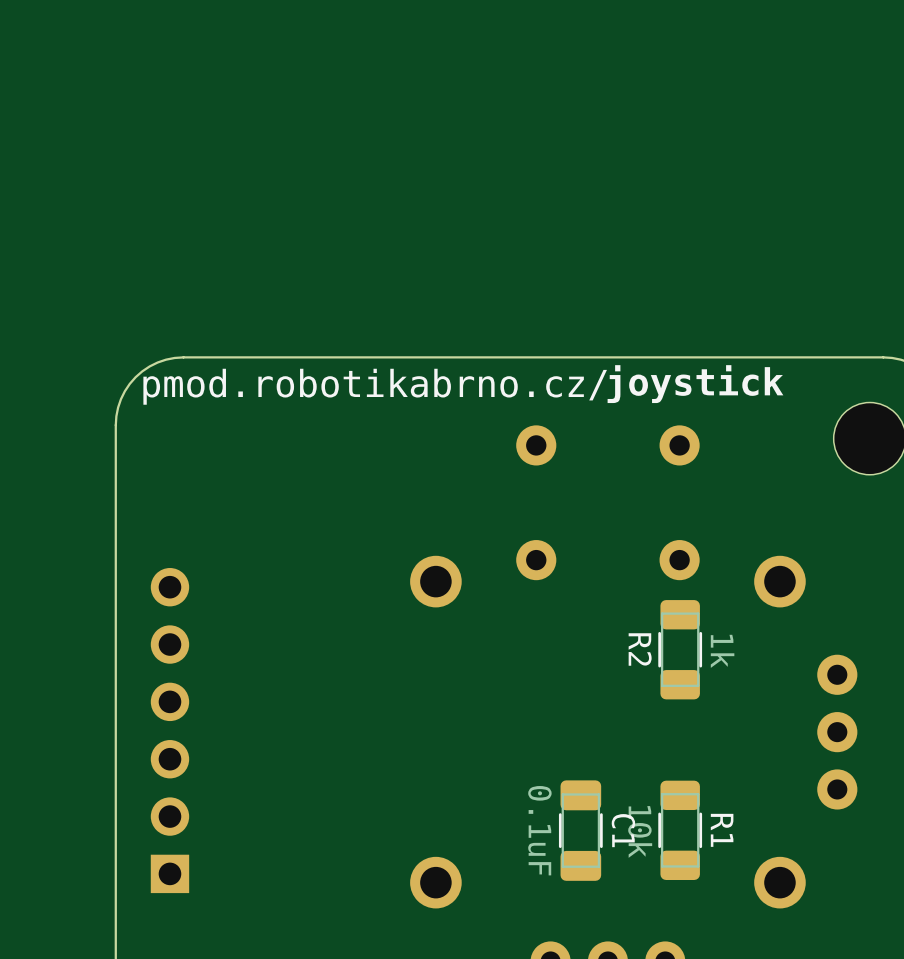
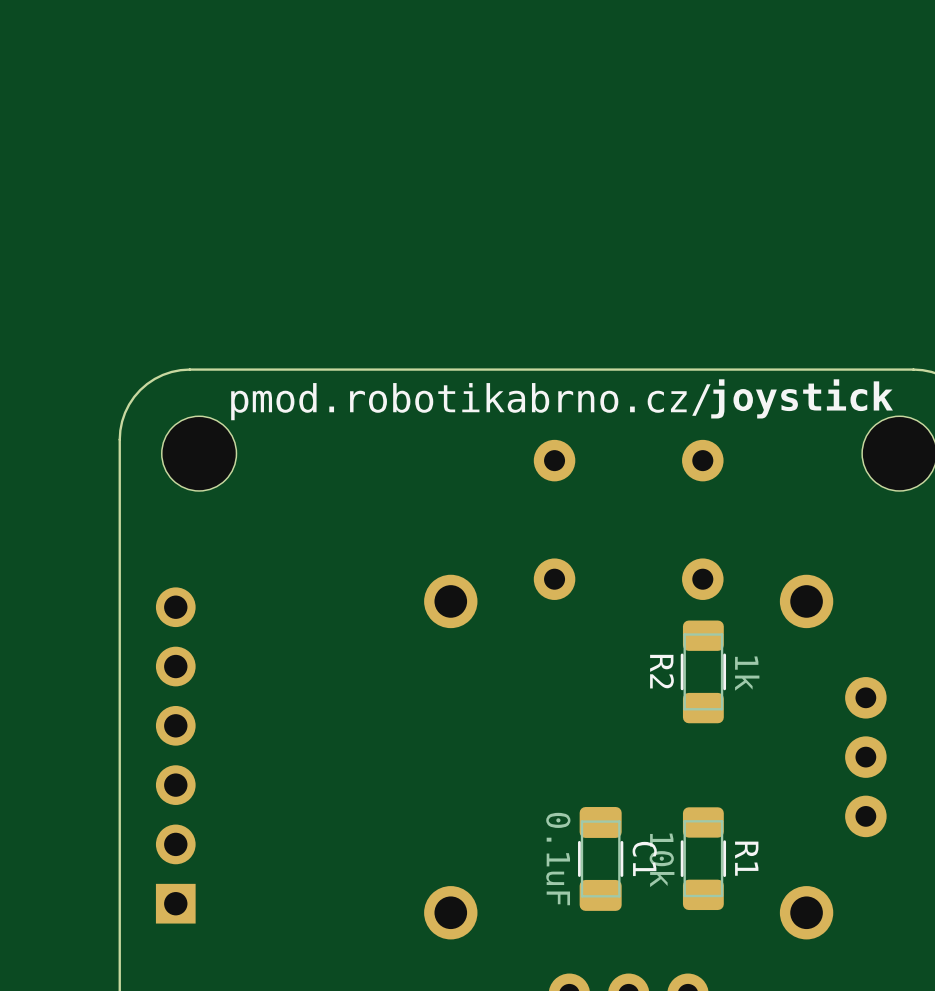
text position: joystick (695, 384) -> joystick (802, 398)
text position: pmod.robotikabrno.cz/ (375, 386) -> pmod.robotikabrno.cz/ (470, 401)
part: none -> (199, 453)

